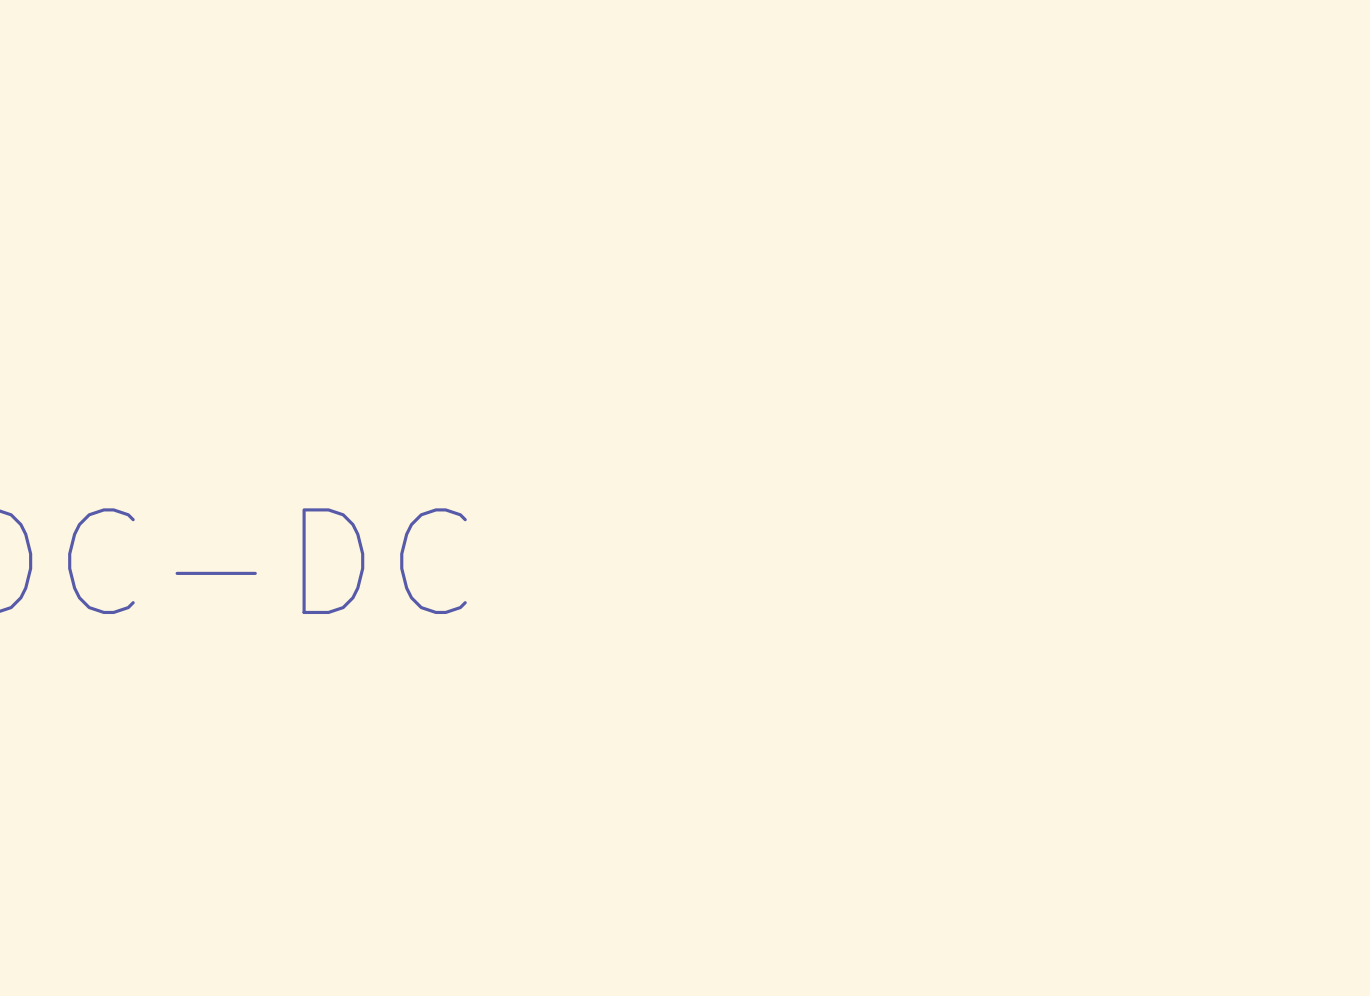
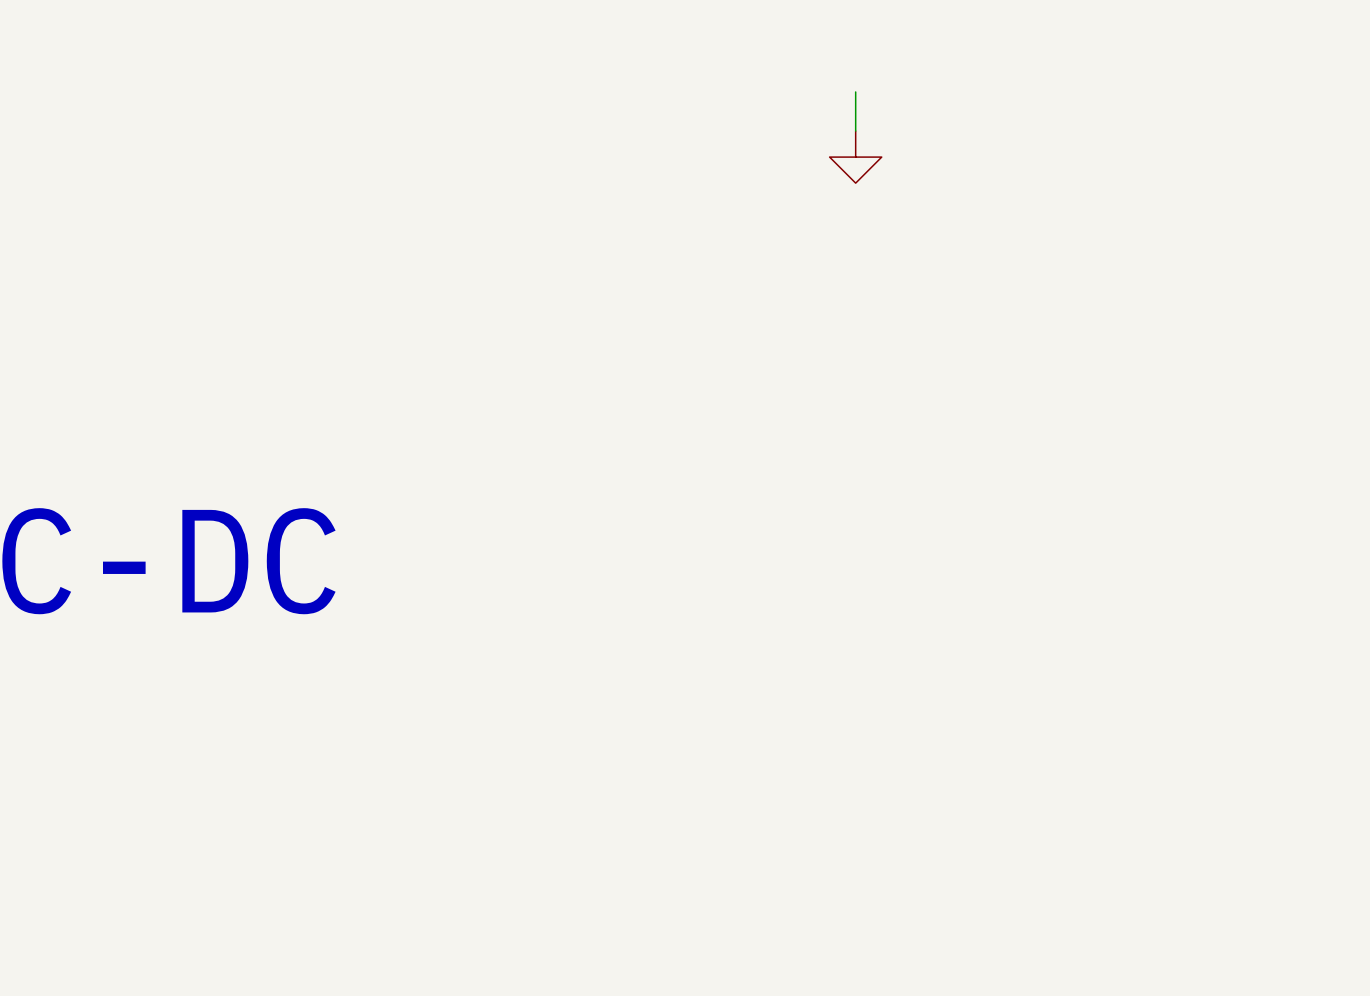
wire: none -> (855, 91) (855, 131)
power symbol: none -> (855, 157)

